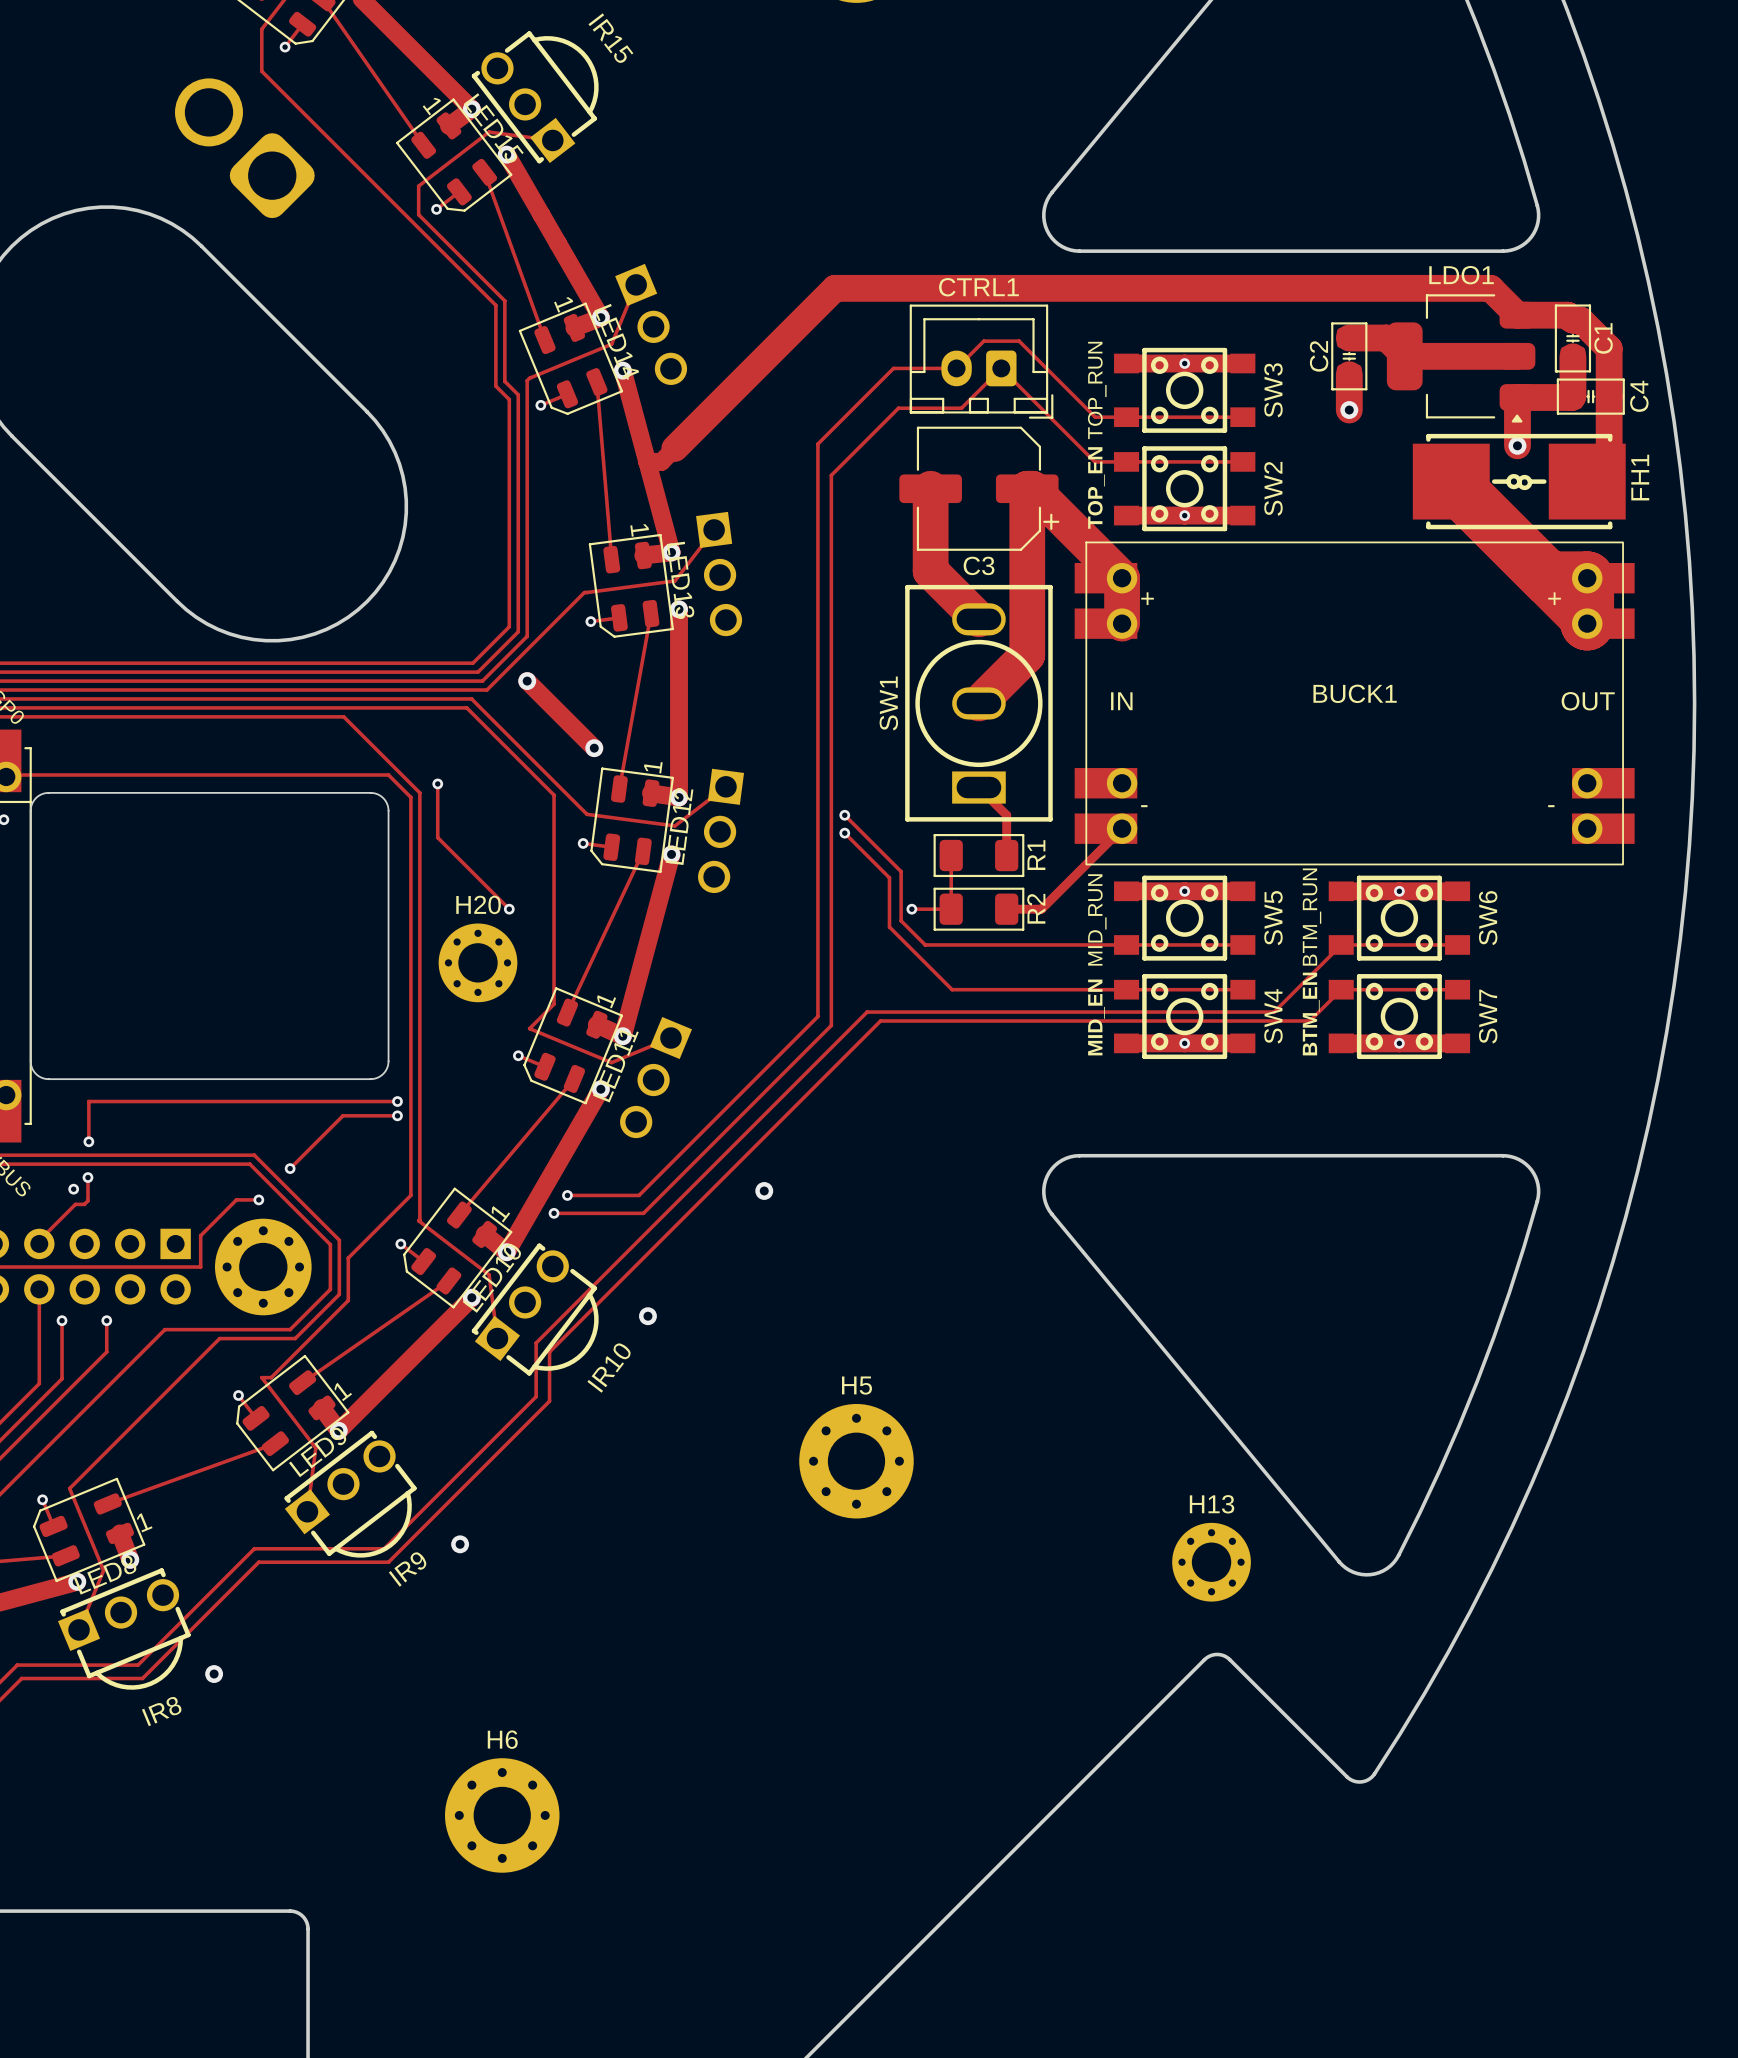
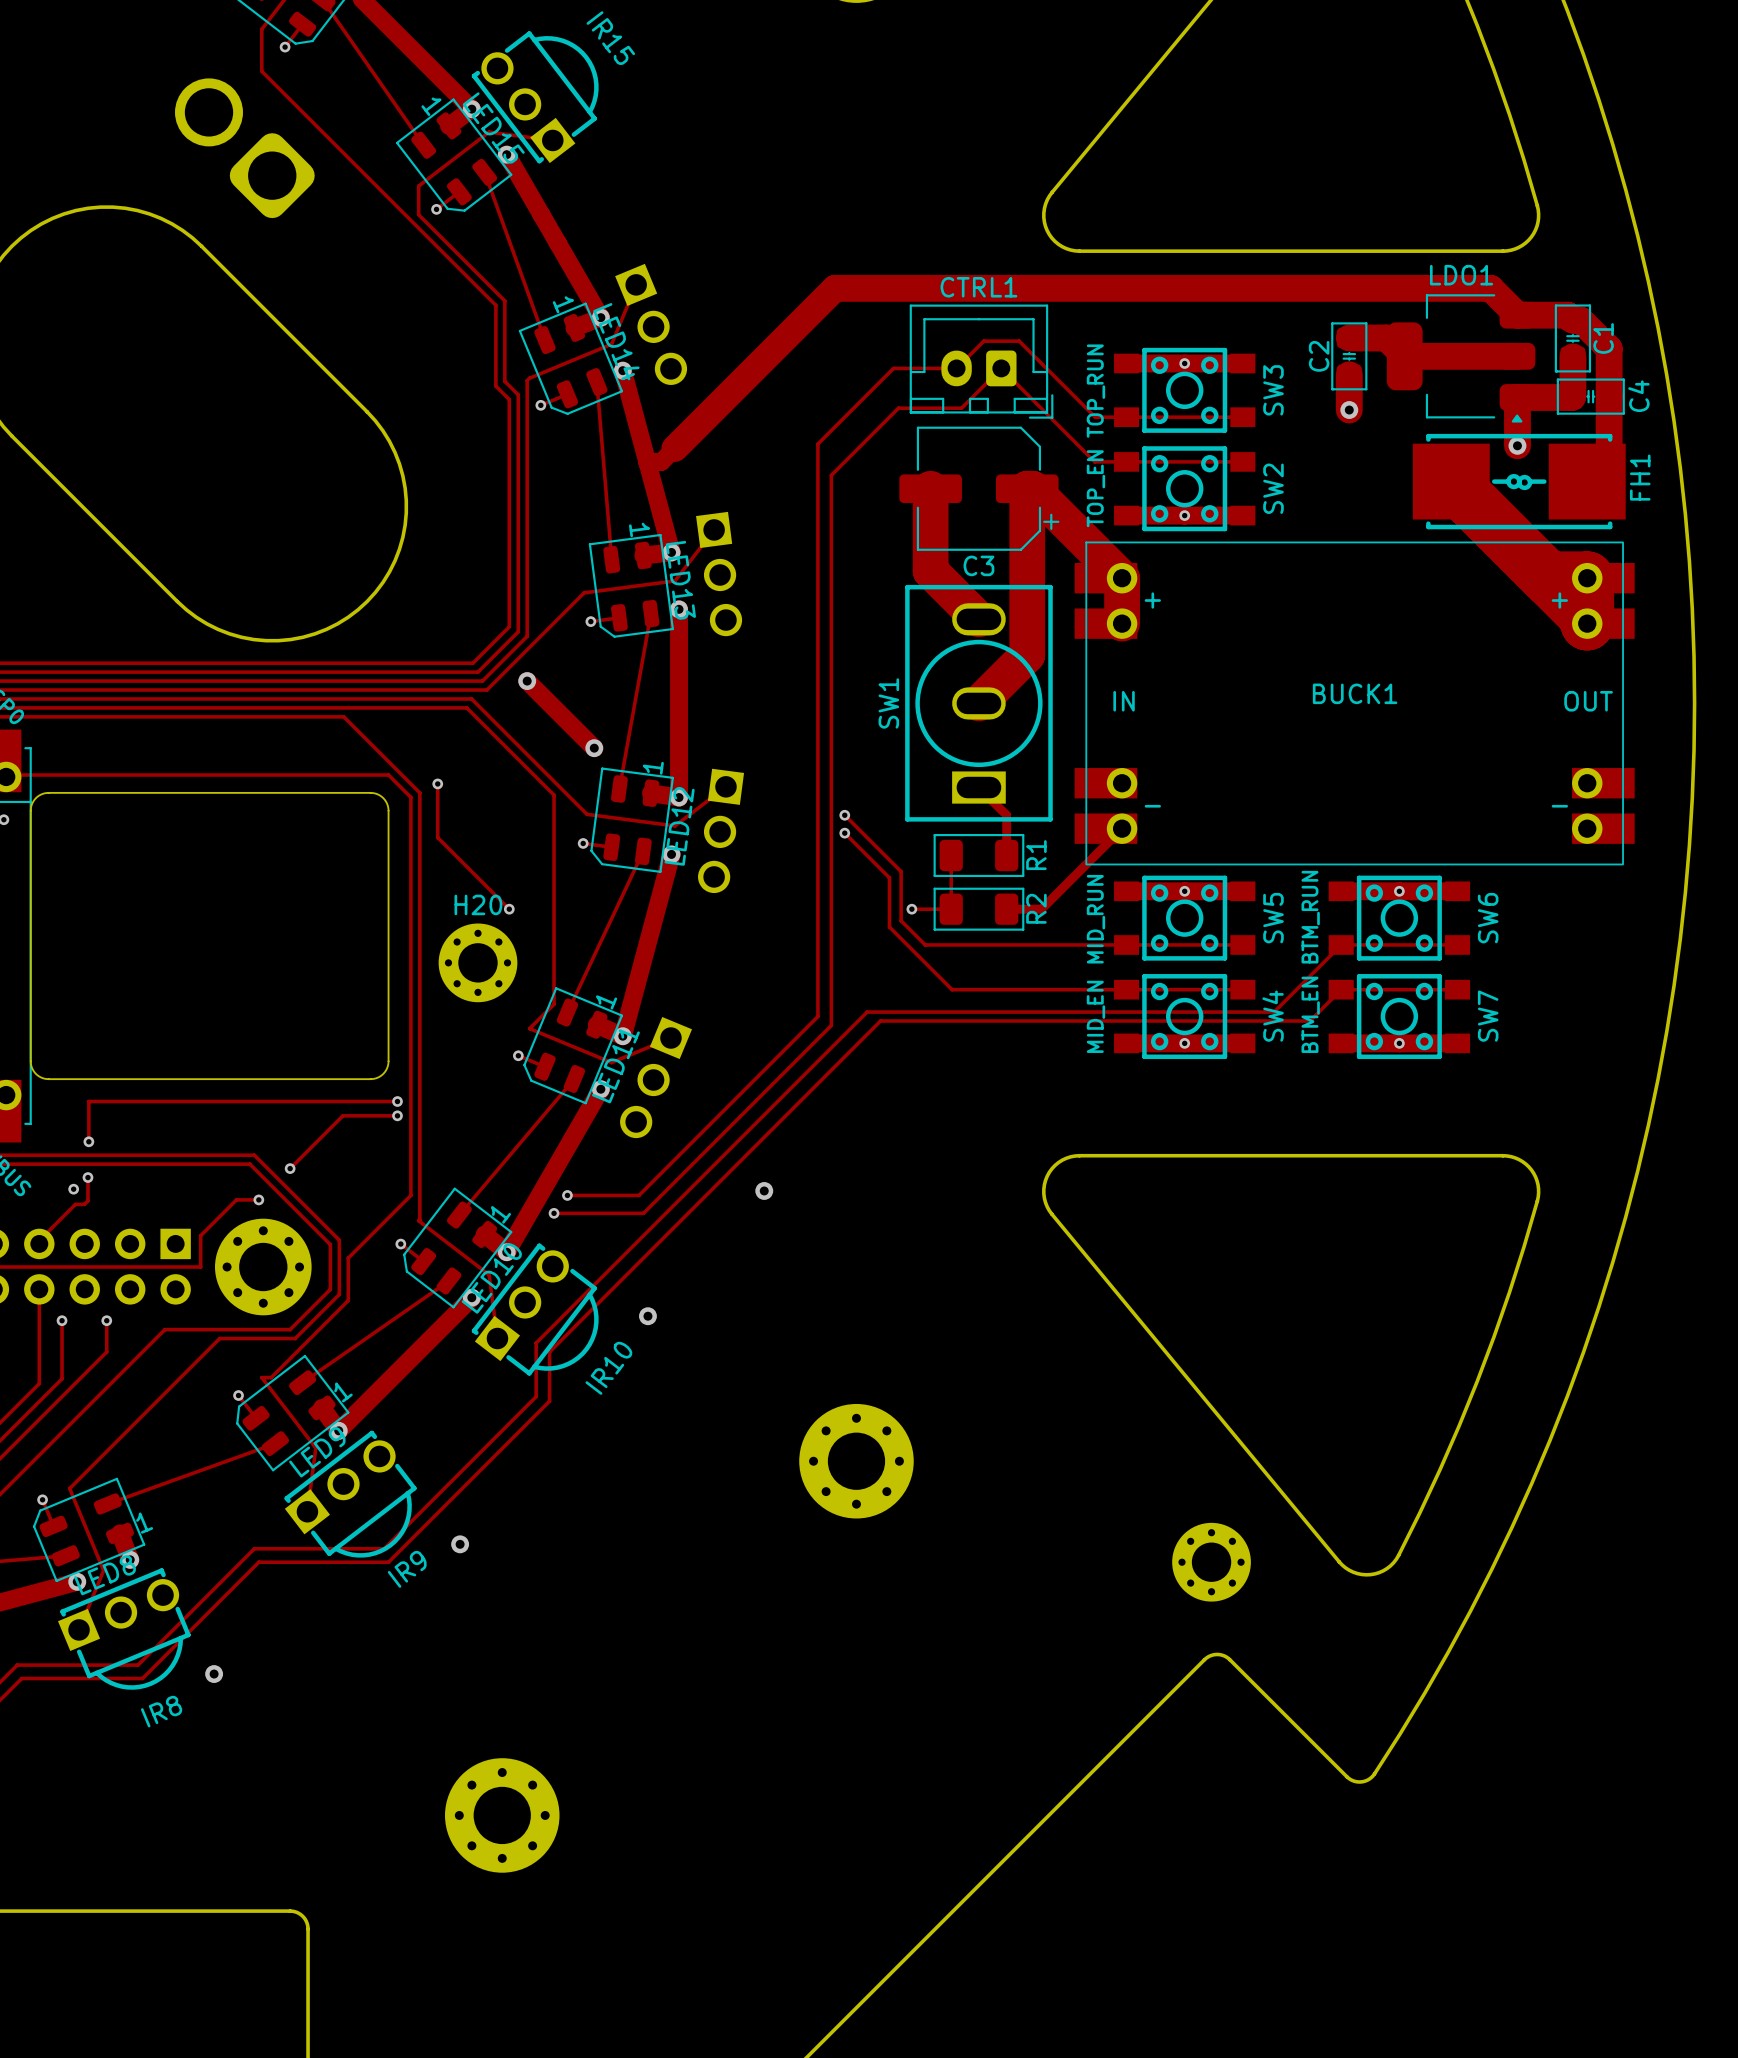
H5 name: H5 (857, 1385) -> none
H13 name: H13 (1212, 1504) -> none
H6 name: H6 (502, 1739) -> none

